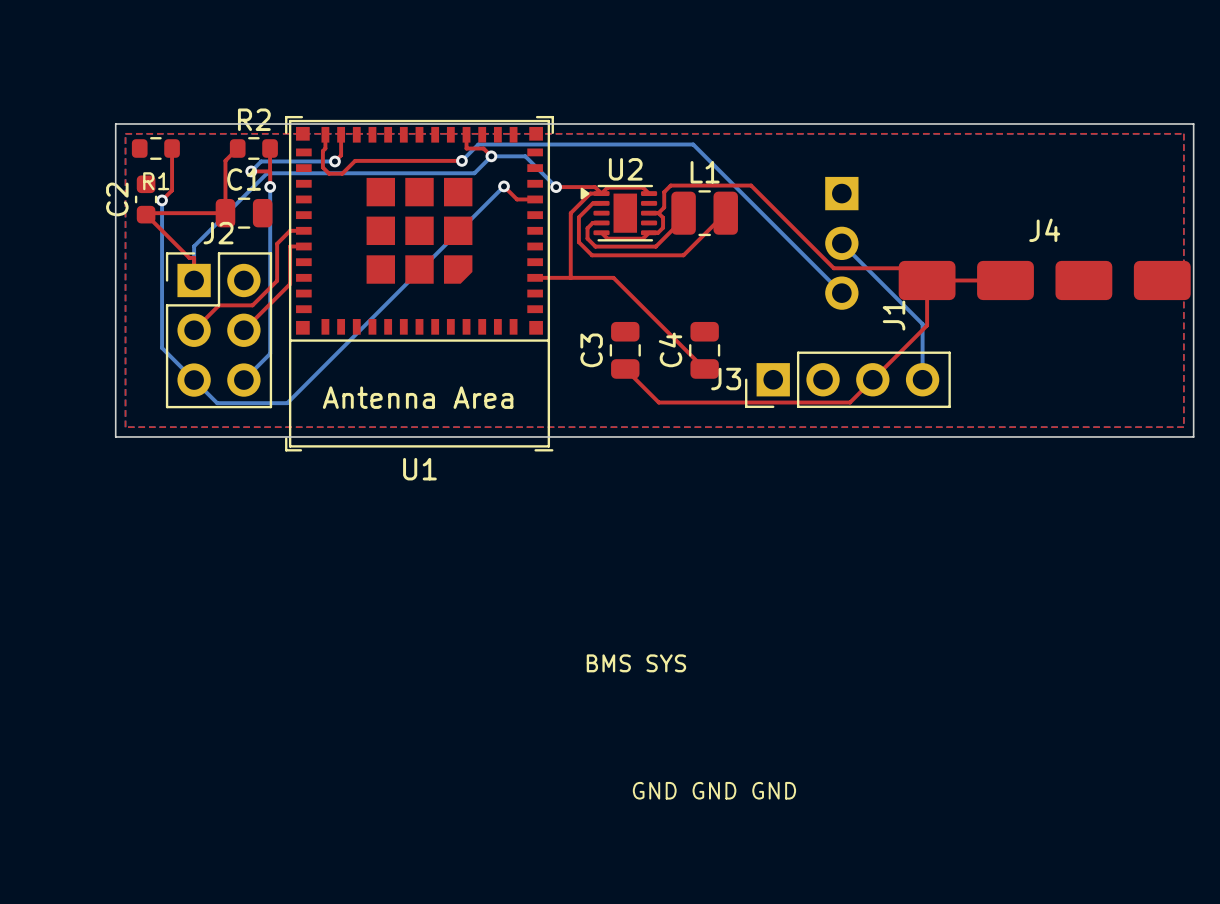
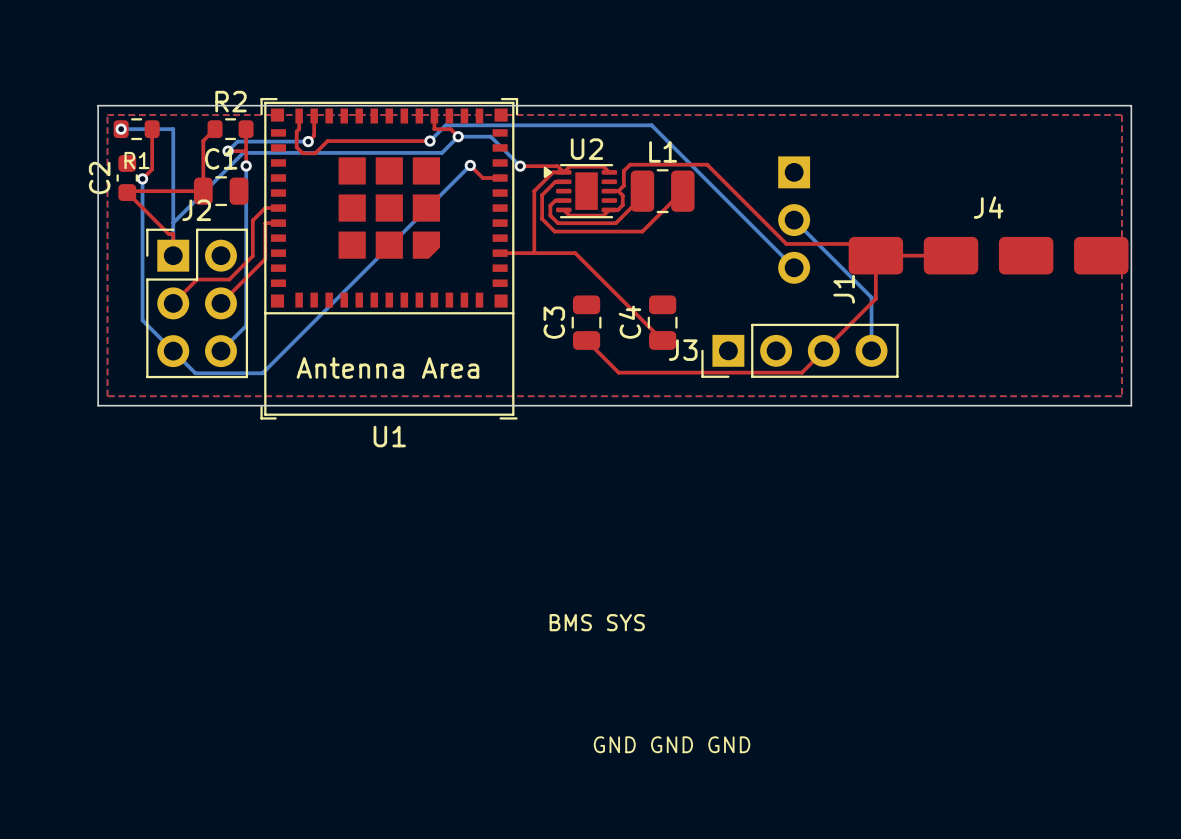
bottom track: none -> (121, 129) (173, 129) (173, 222)
via: none -> (121, 129)

